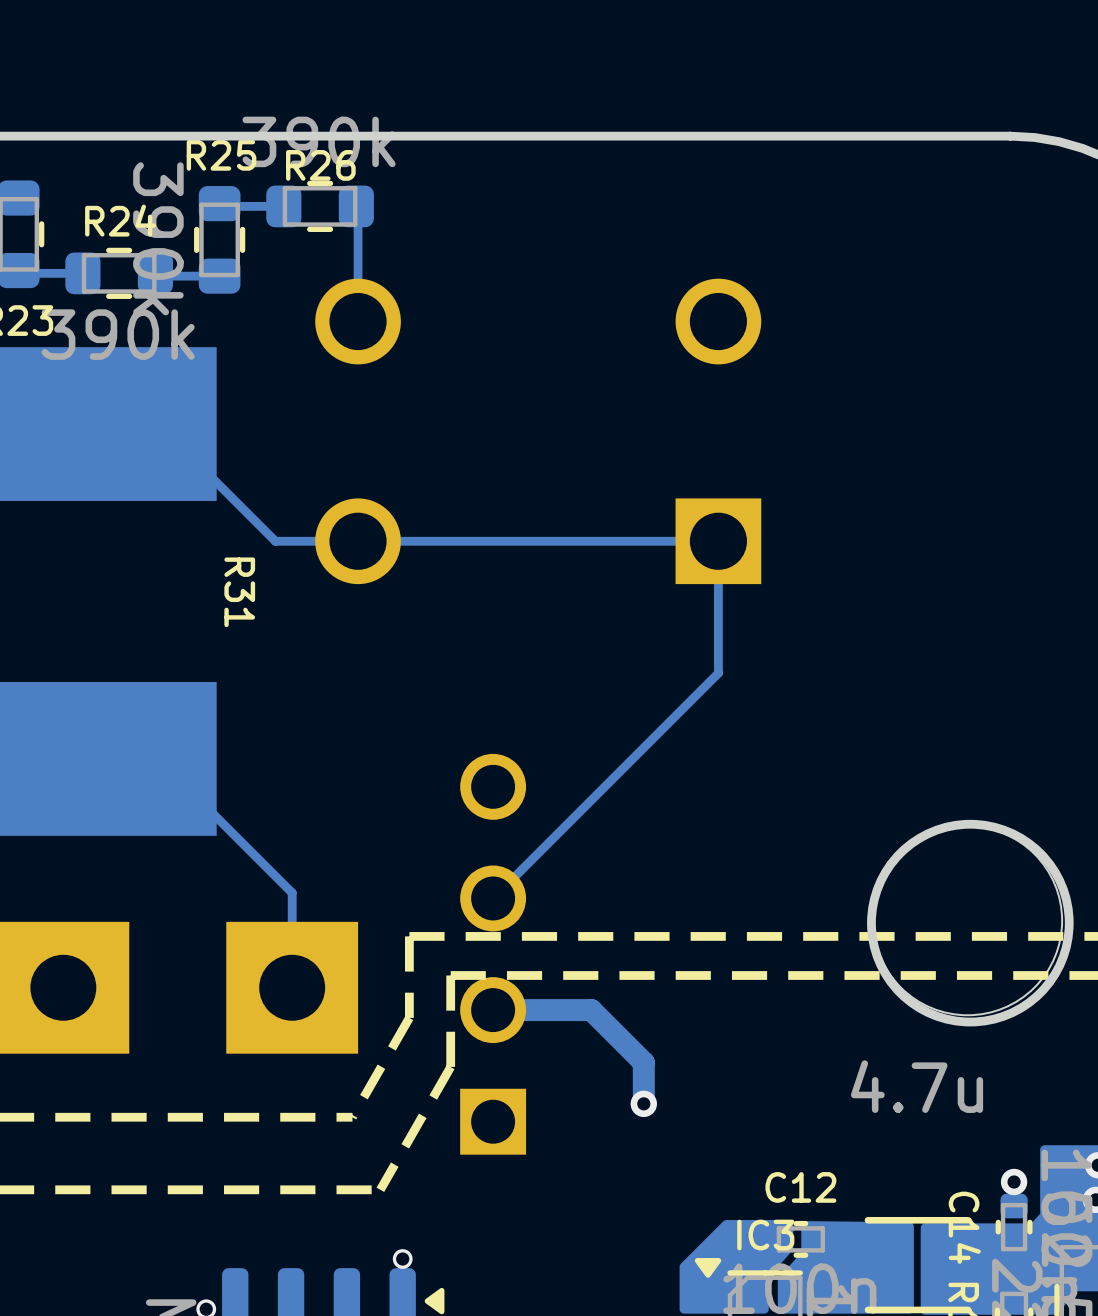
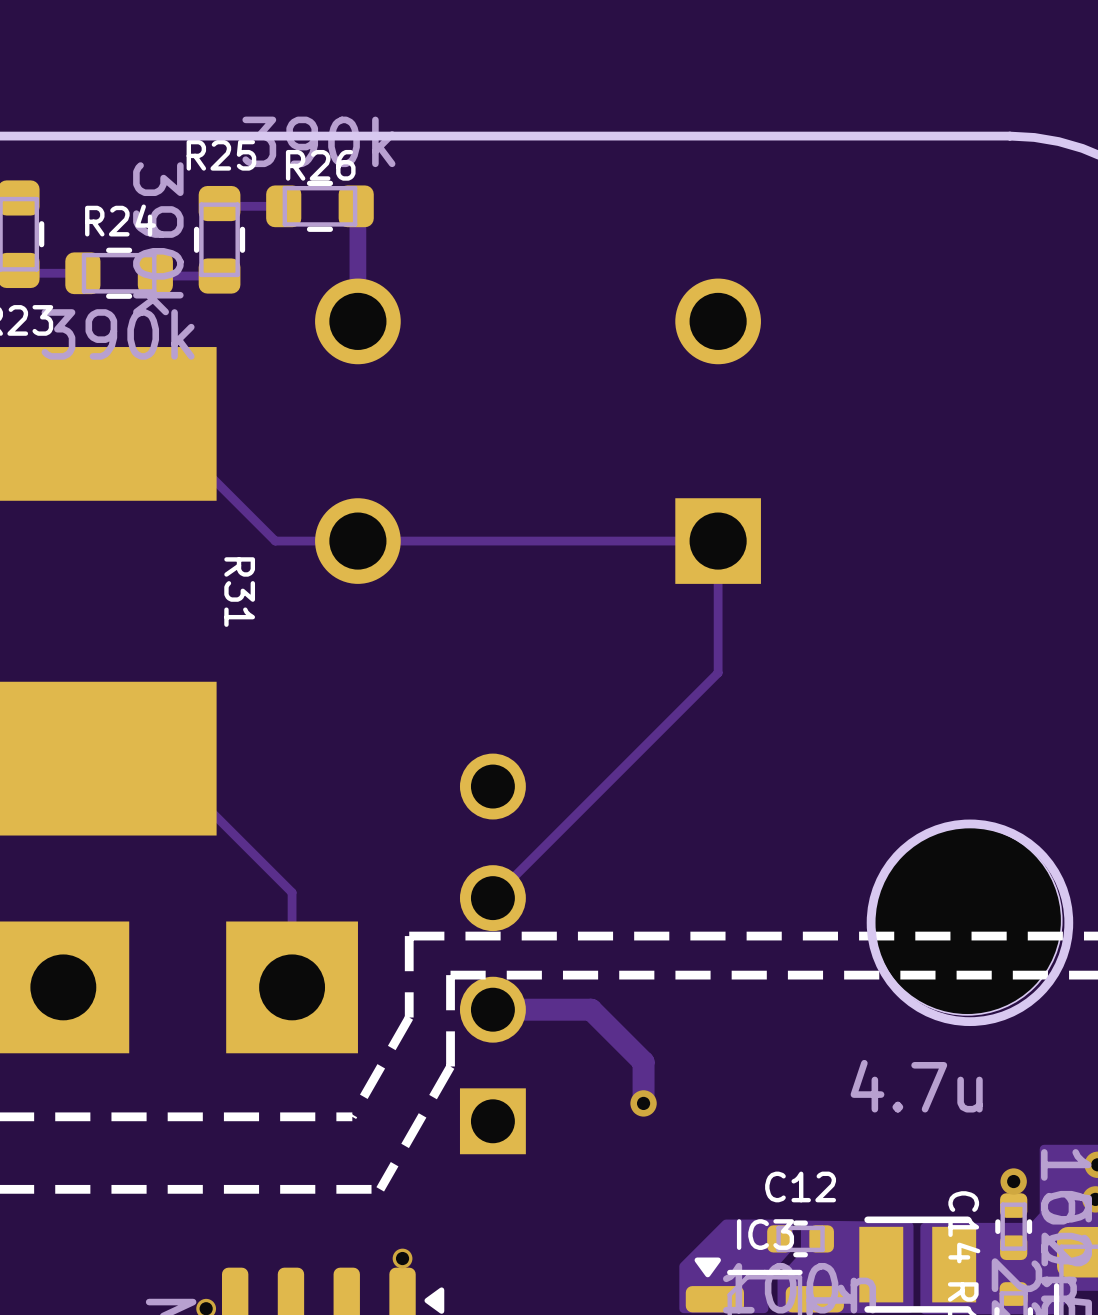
track width: thin (358, 208) (358, 321) -> thick (357, 208) (357, 321)

